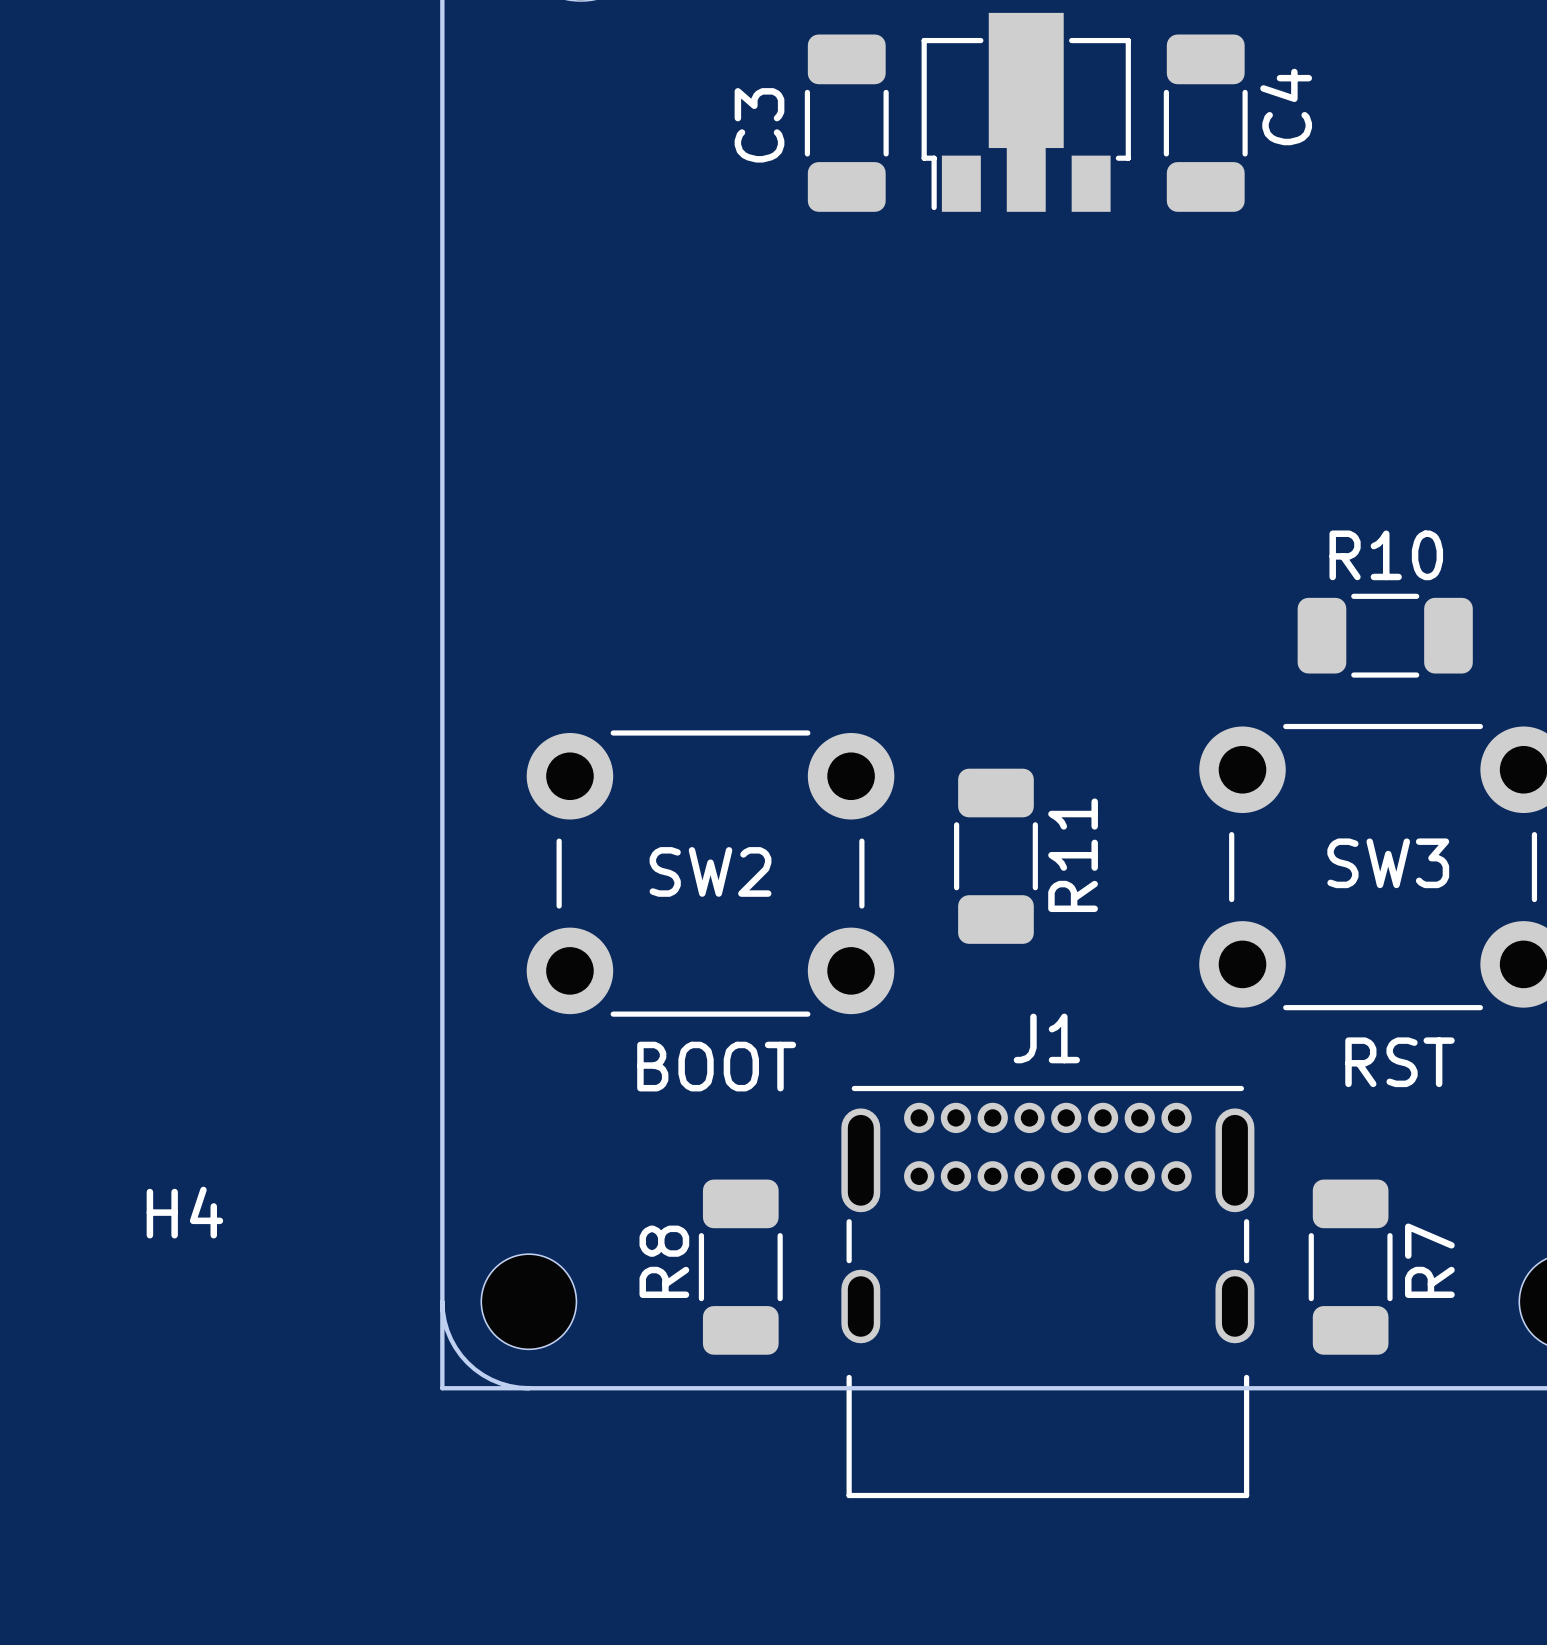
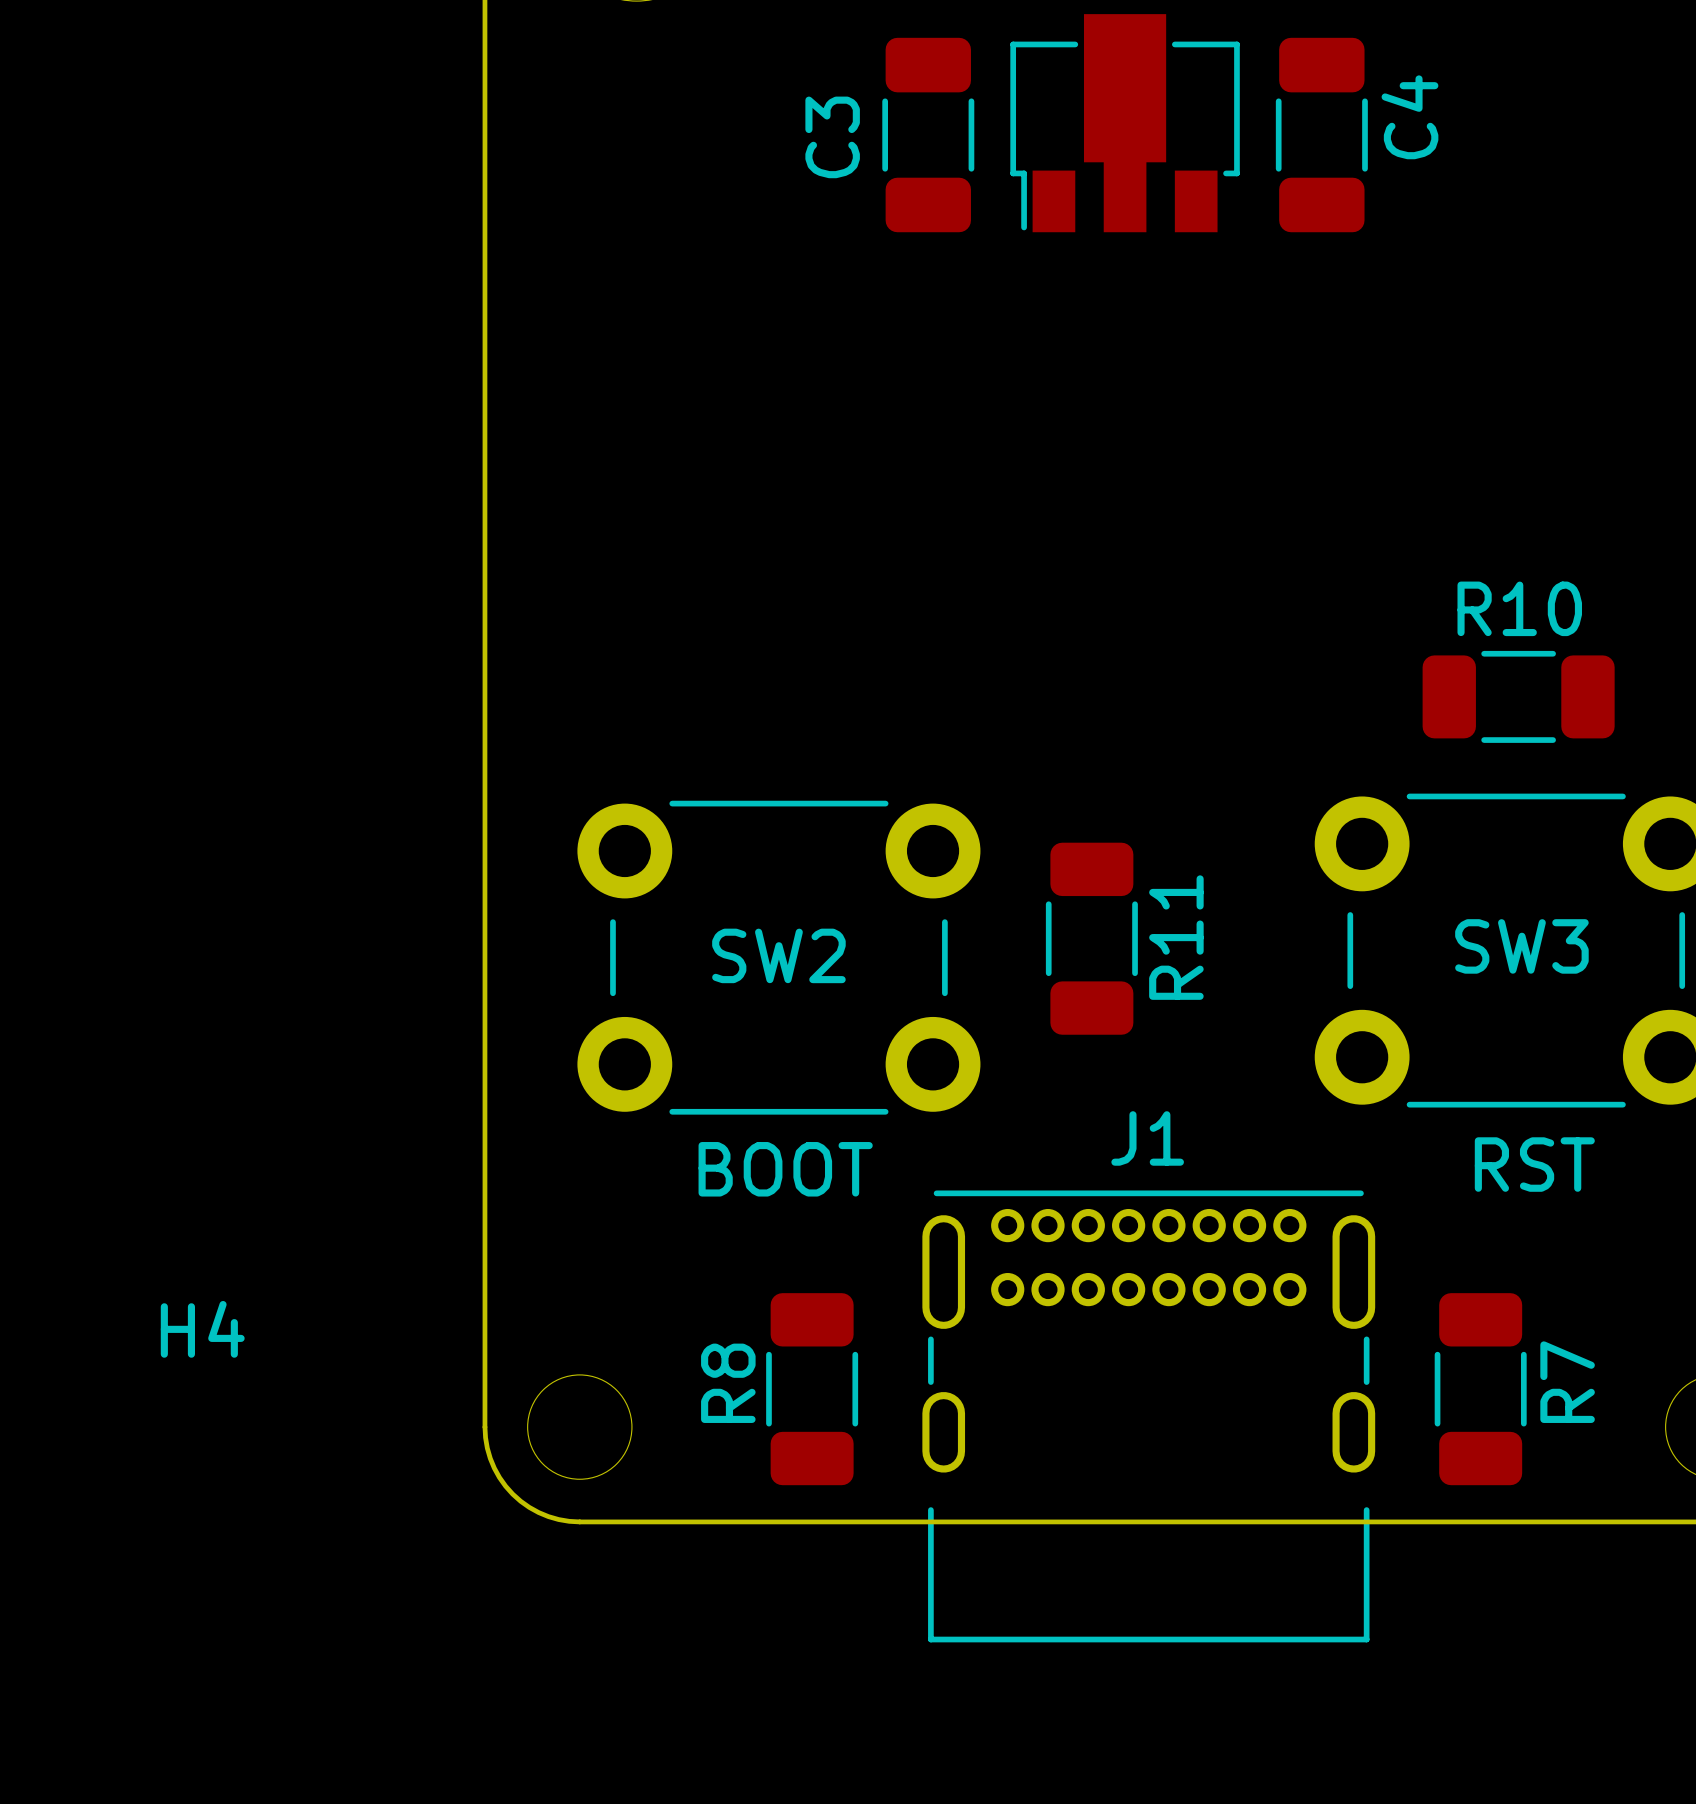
board edge: (442, 1301) (442, 1388) (528, 1388) -> none

